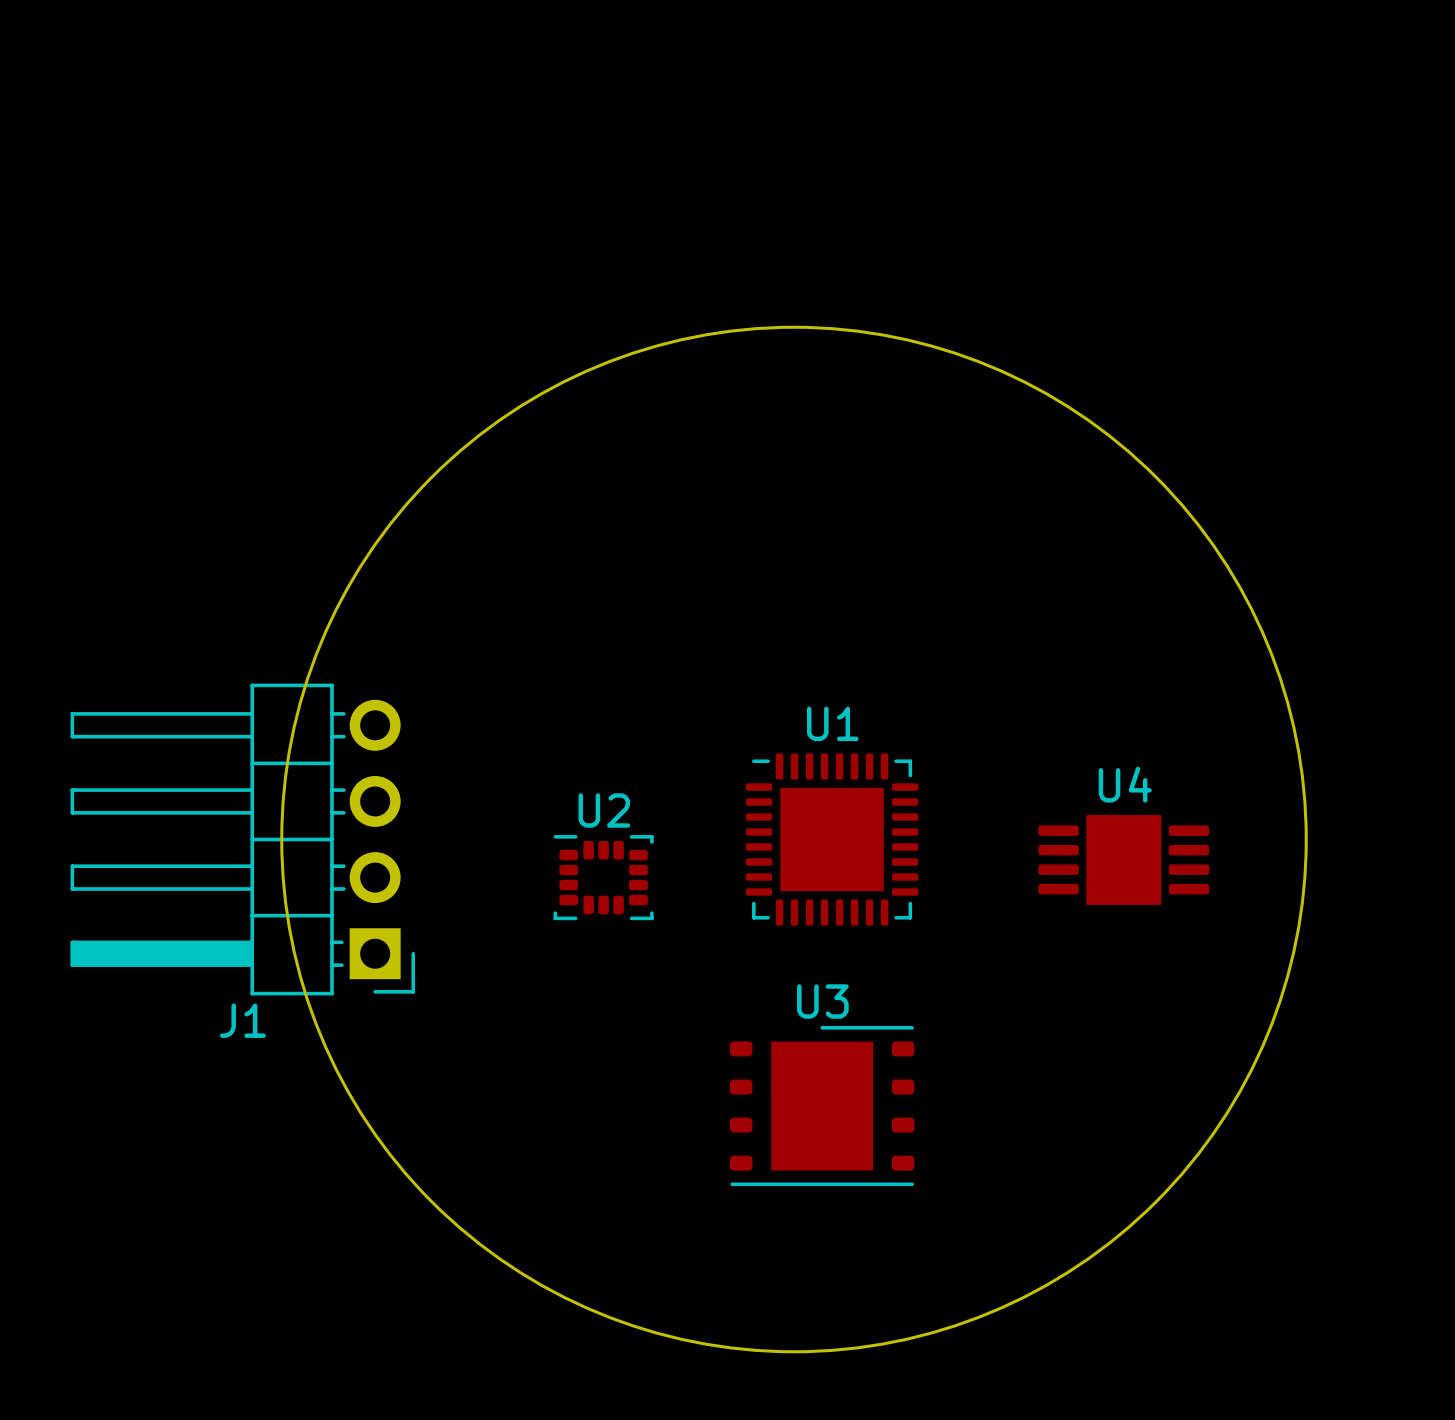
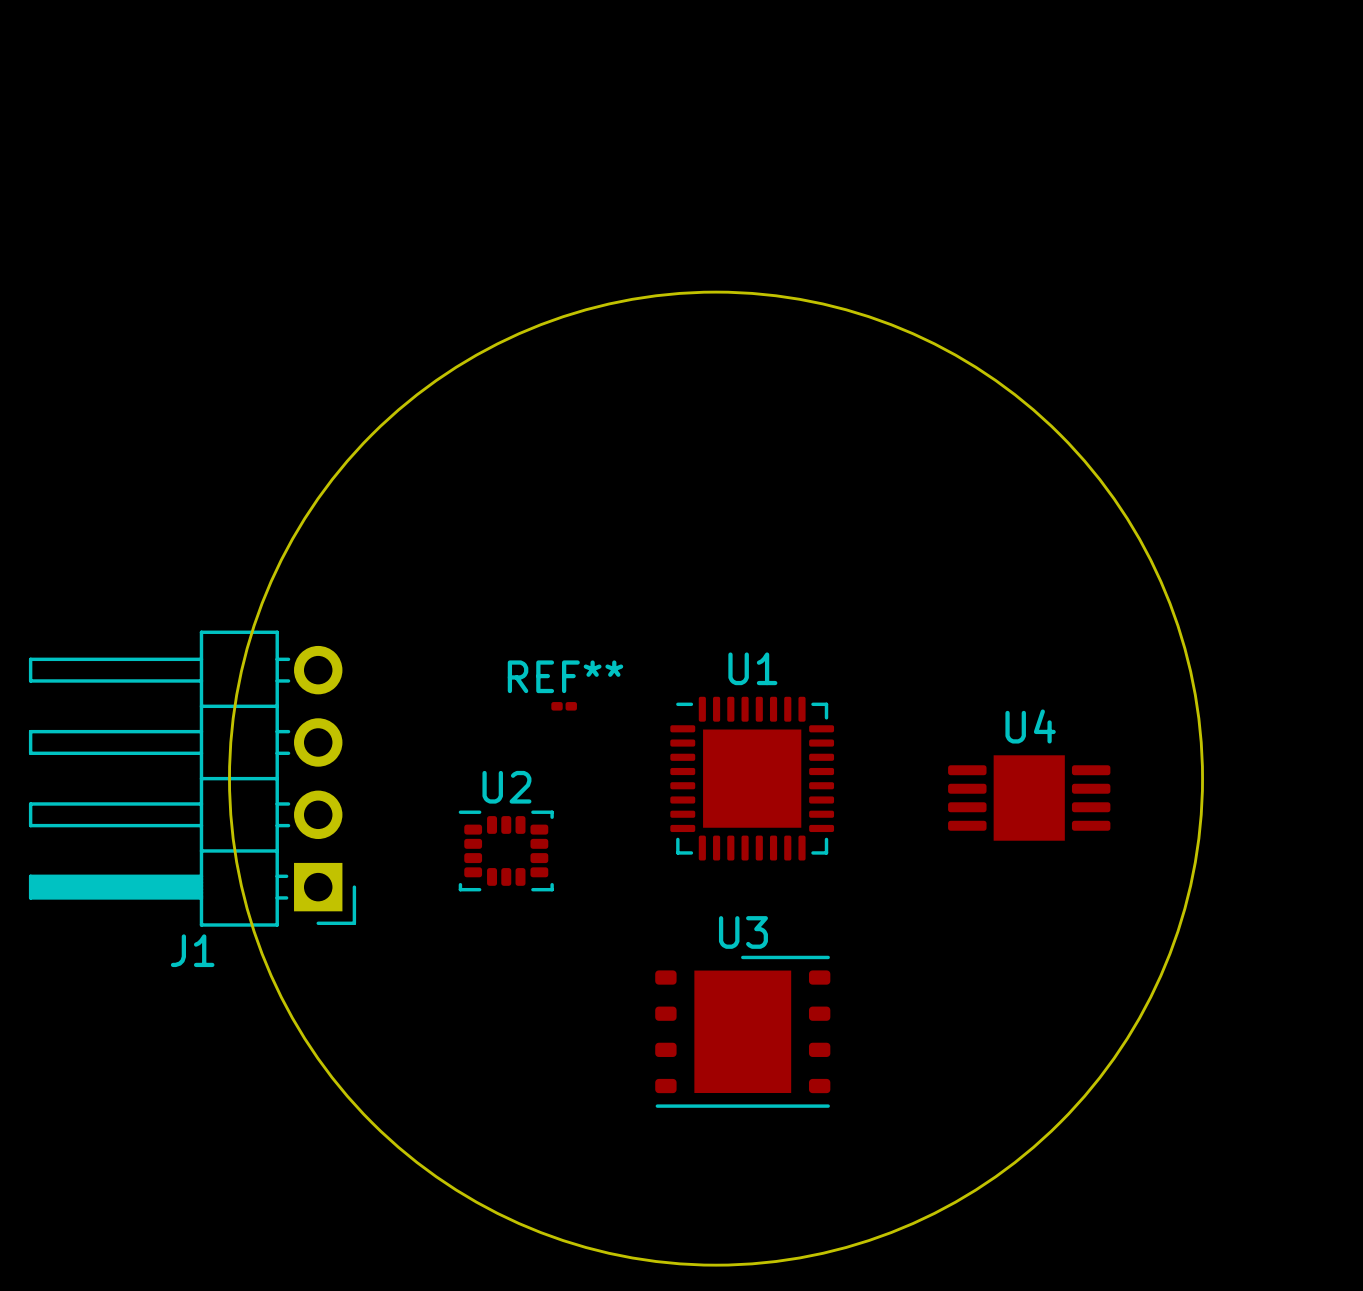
REF**: none -> (564, 706)
U2 position: (603, 877) -> (506, 850)

